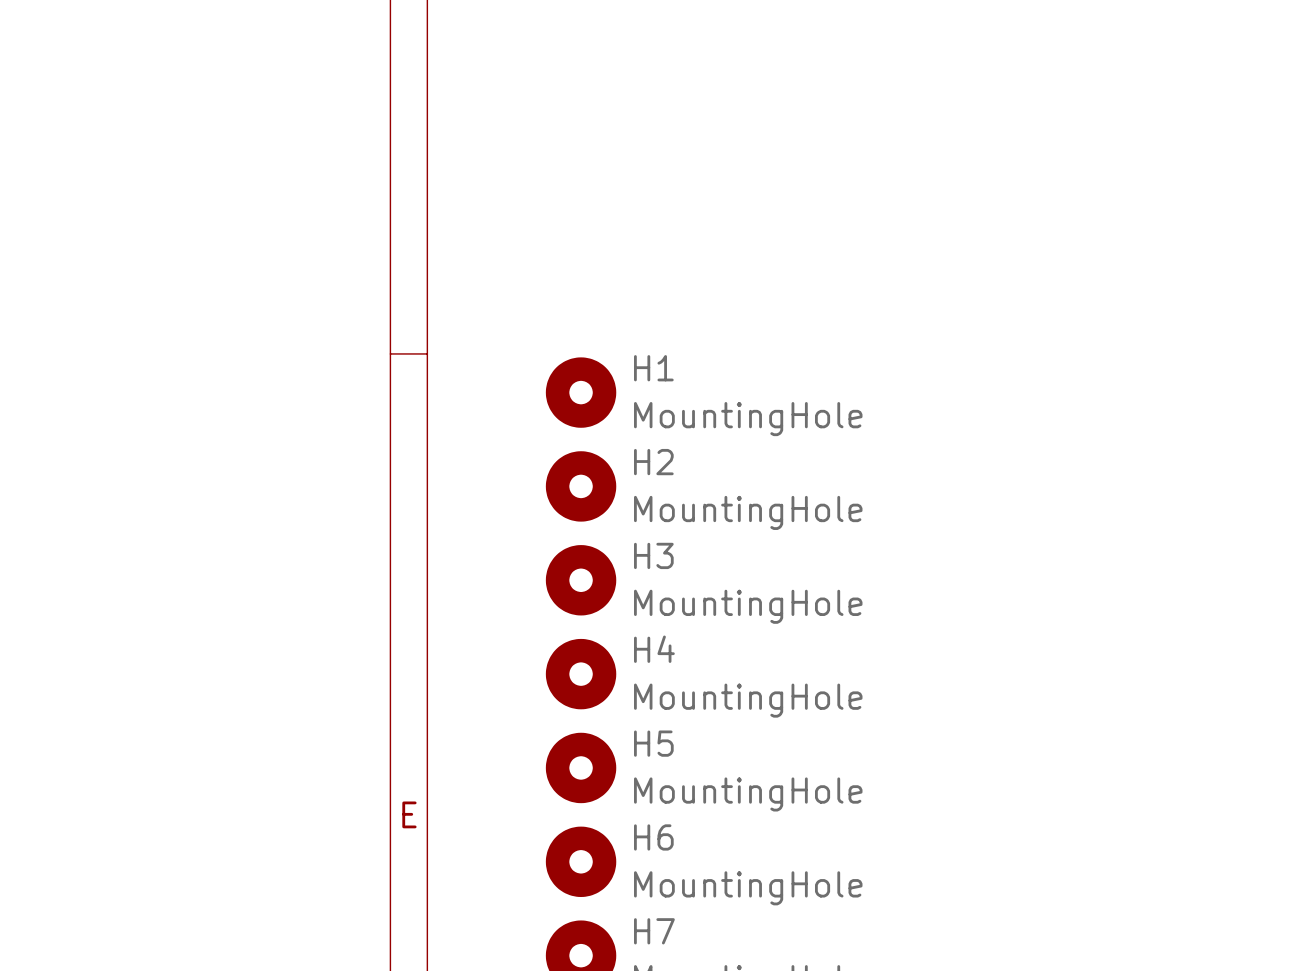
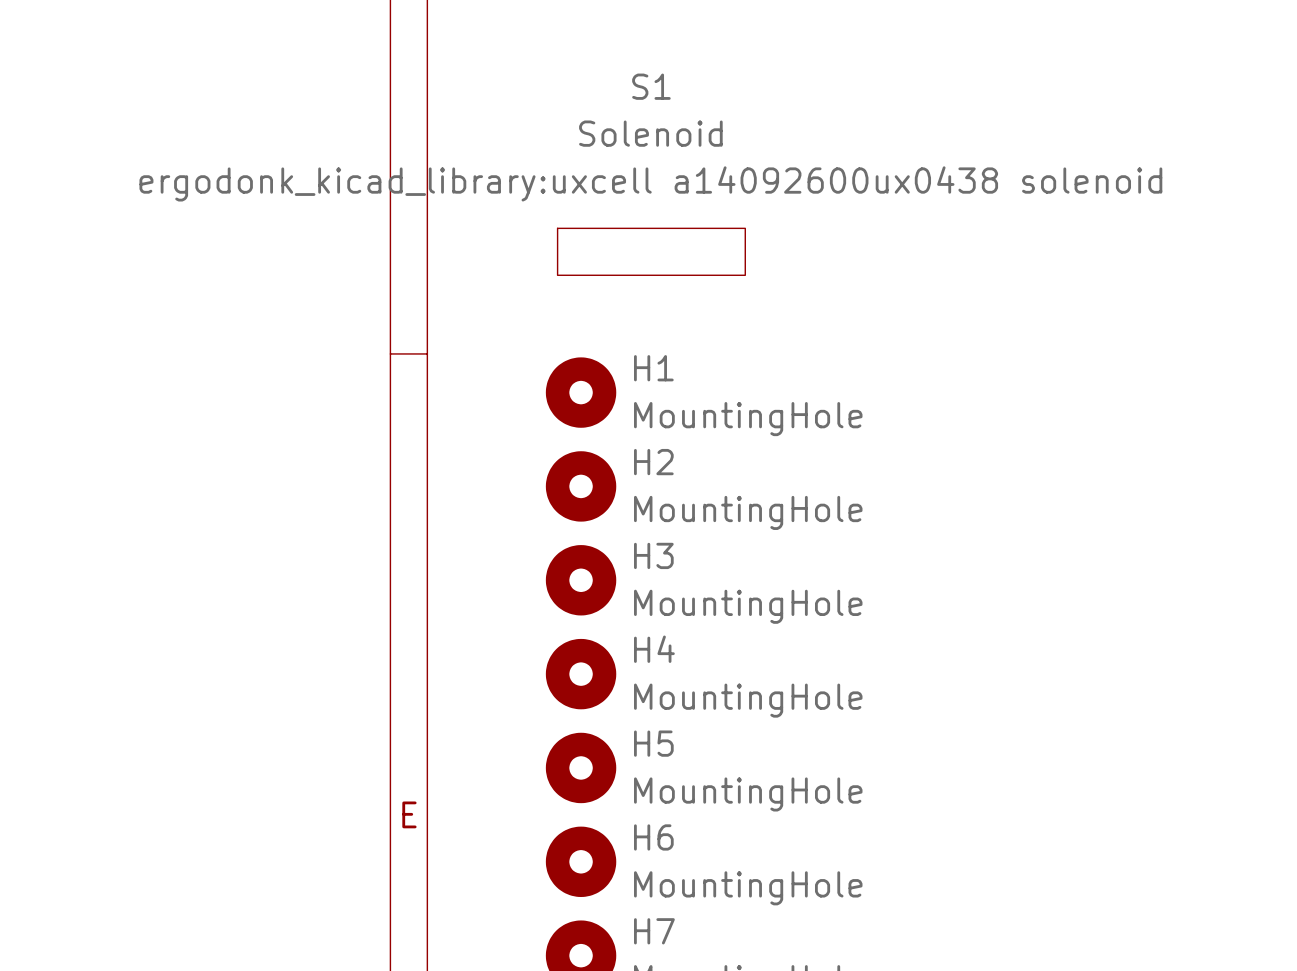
S1: none -> Solenoid (651, 251)

